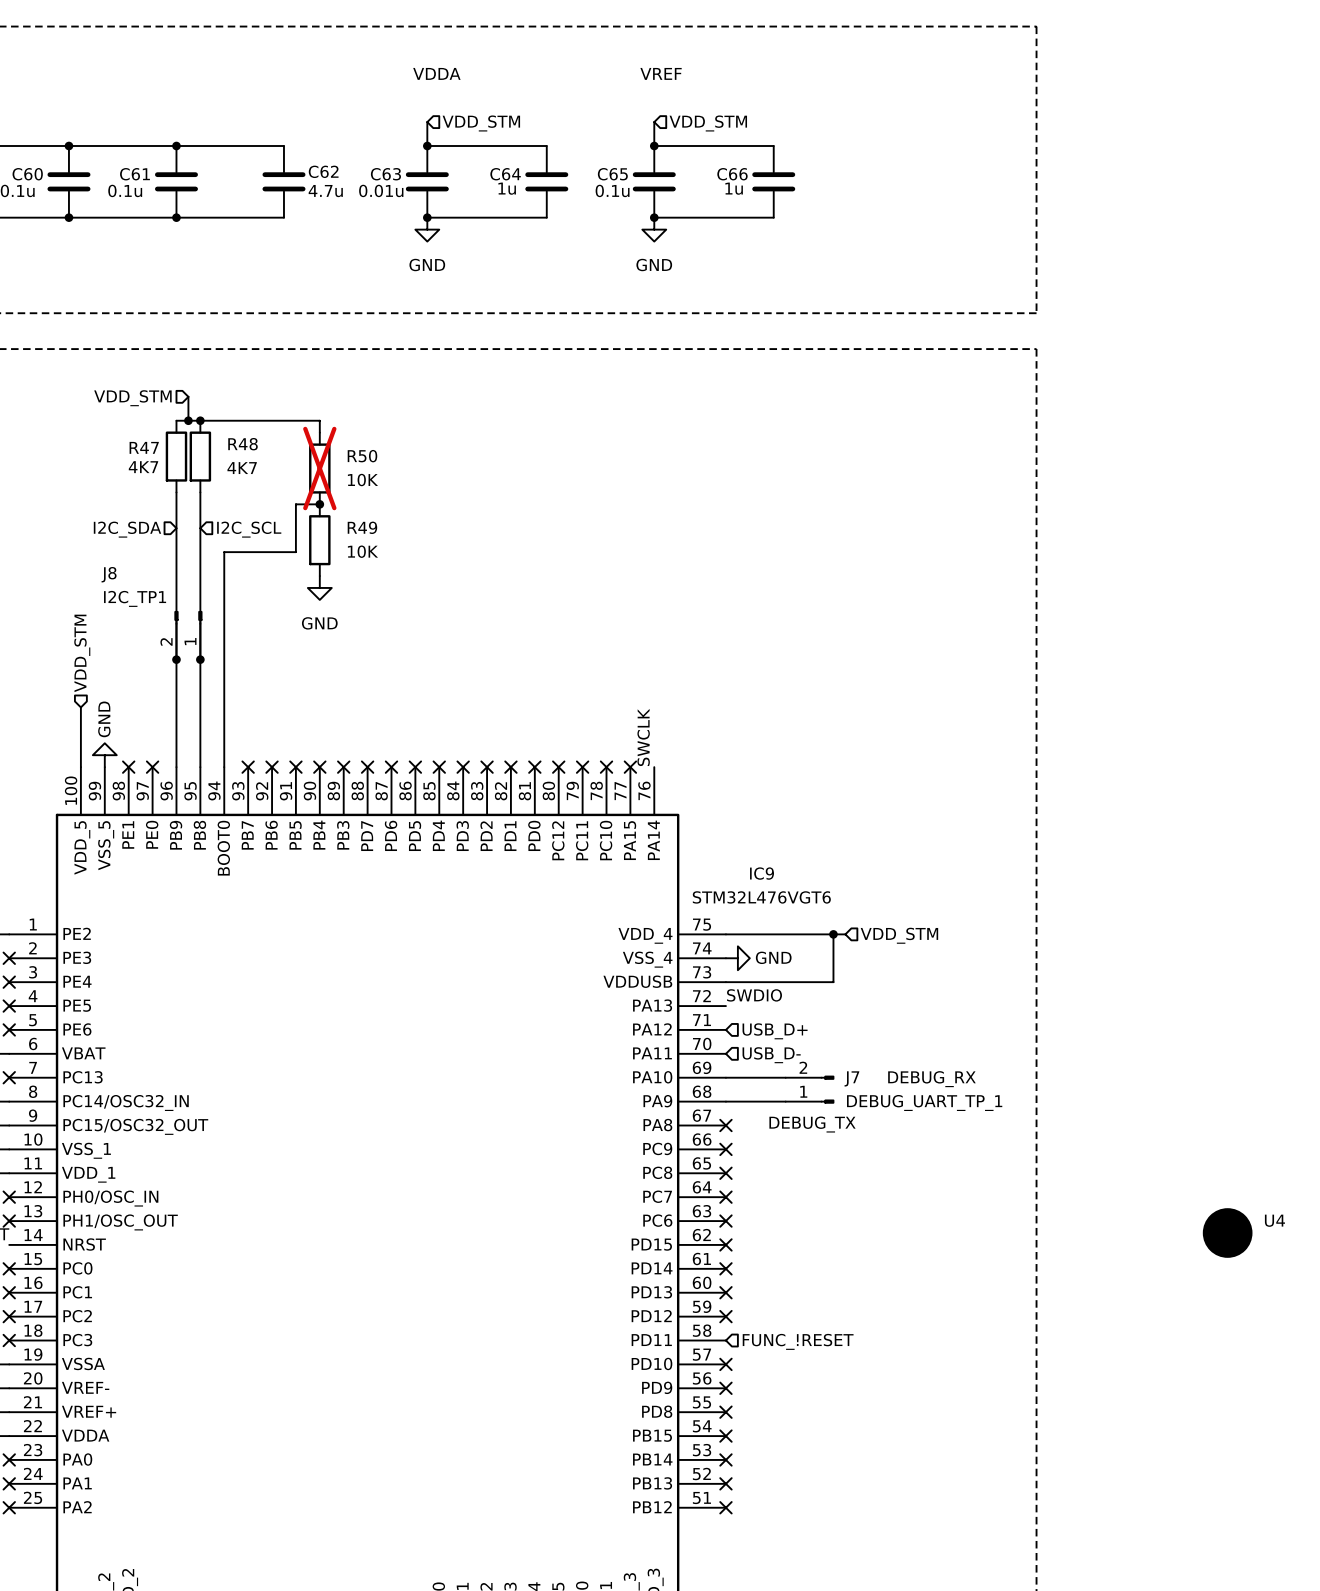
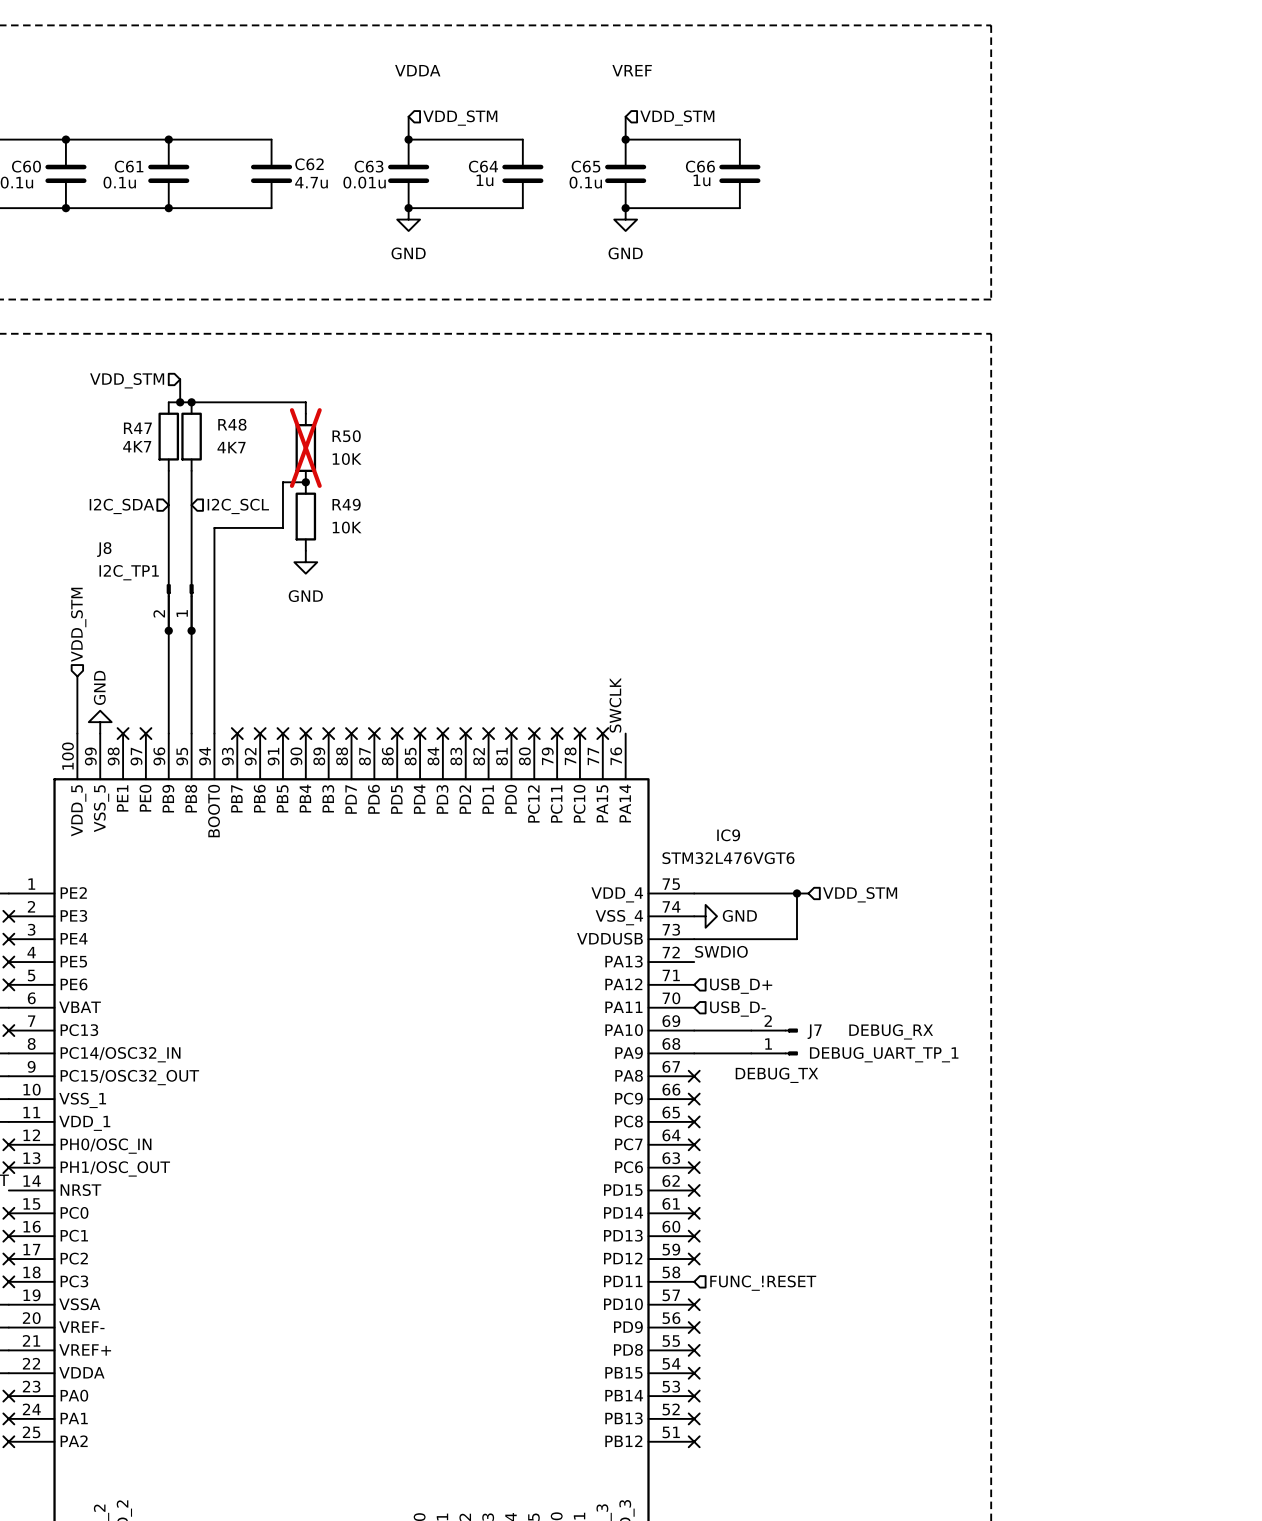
U4: (1227, 1233) -> none

